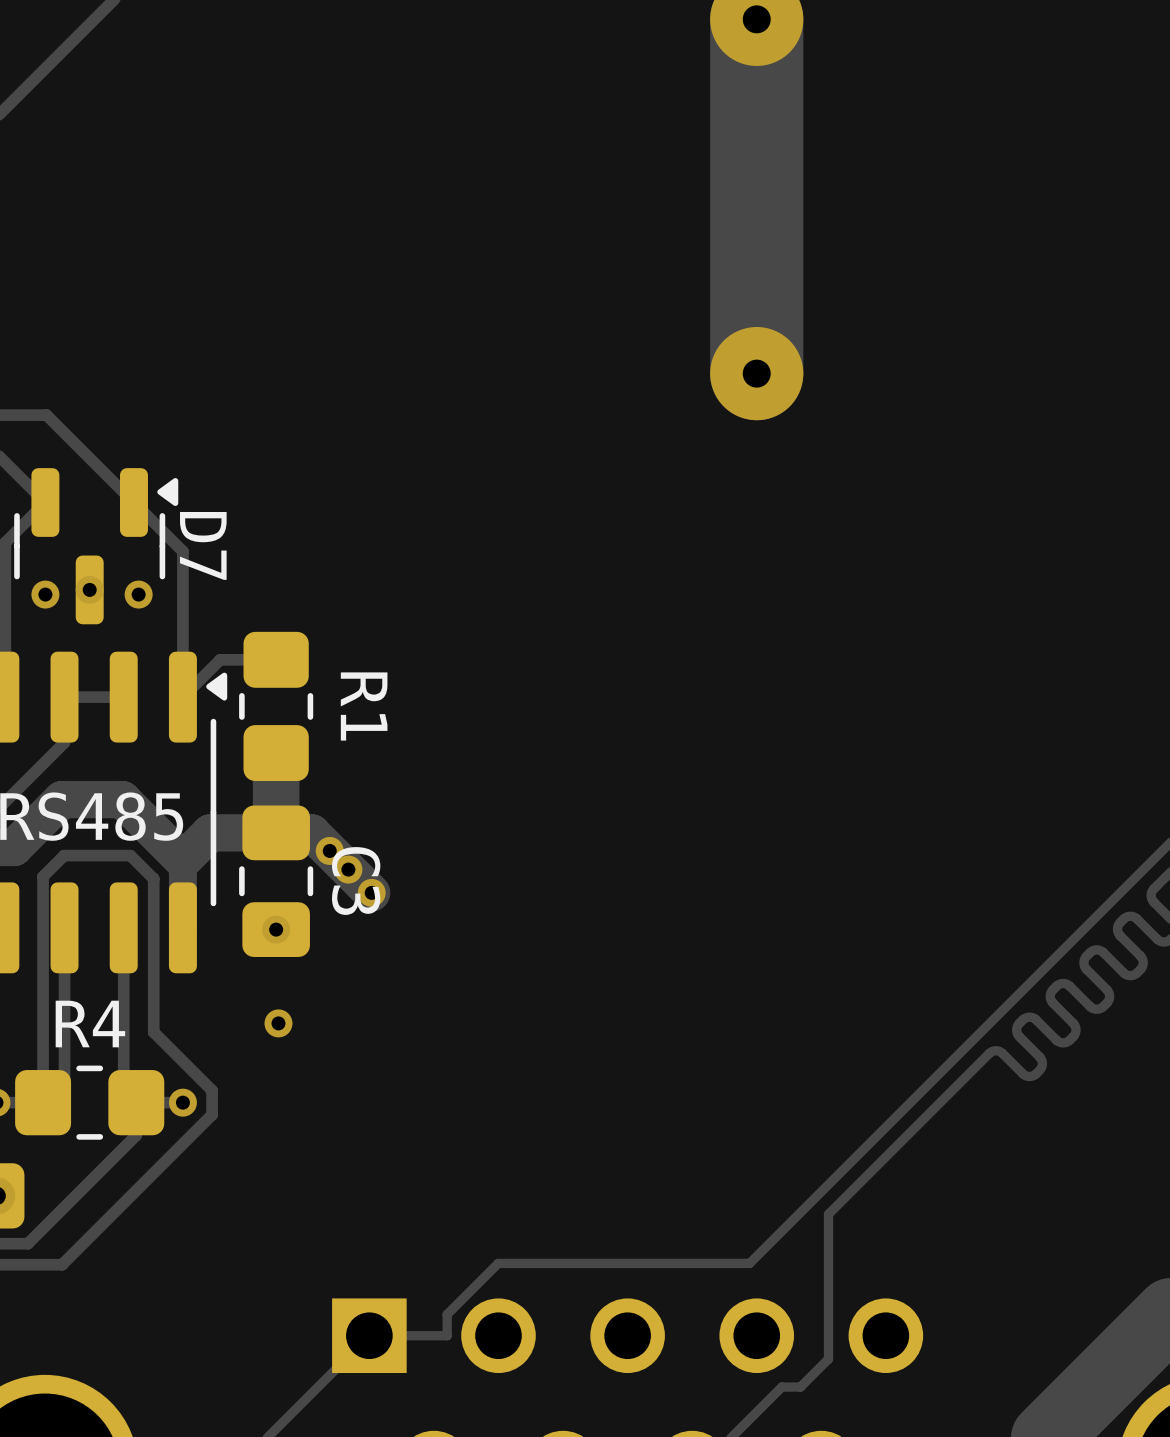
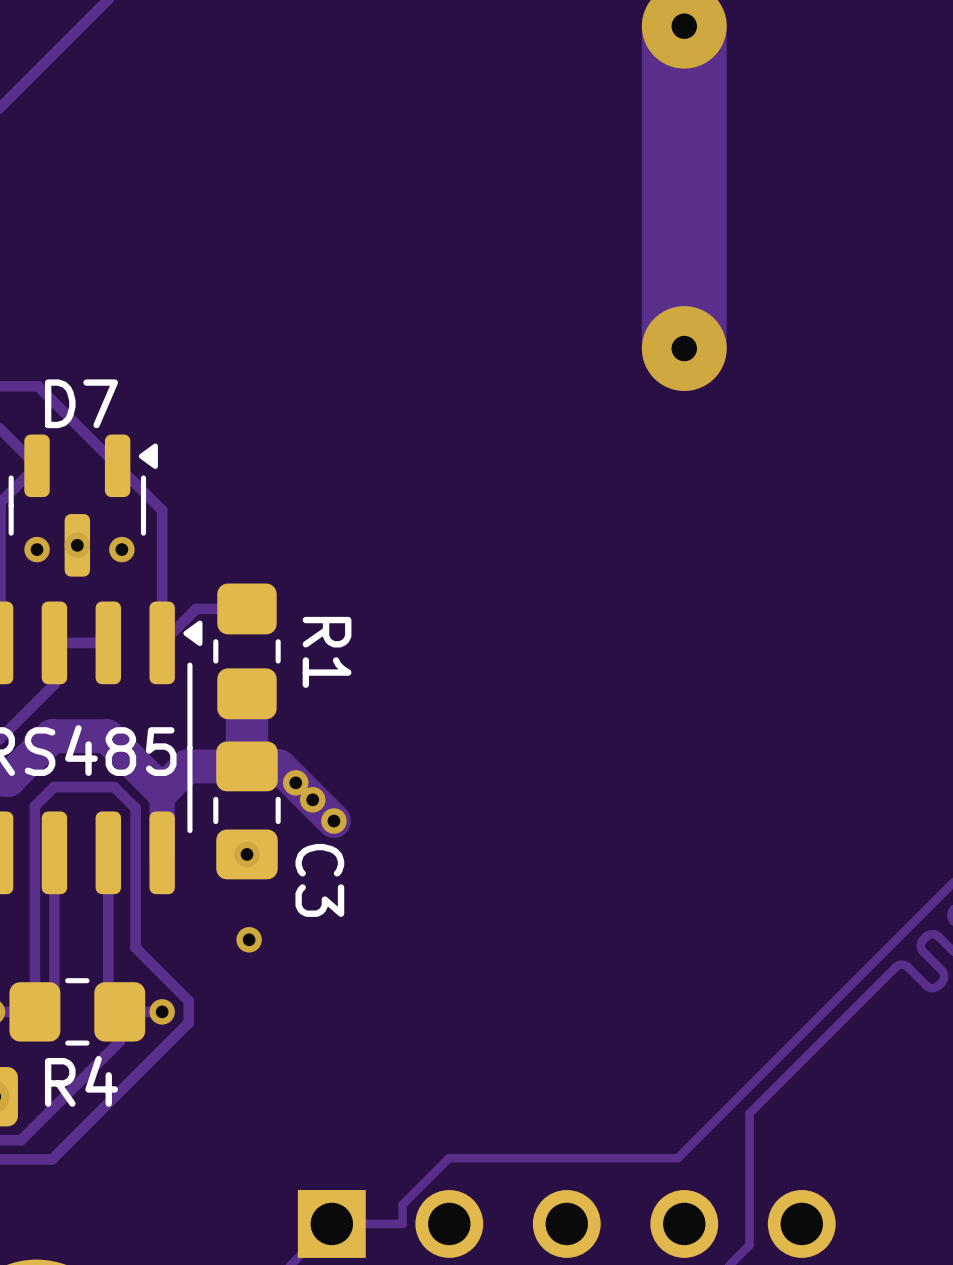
D7 name rotation: 0° (203, 545) -> 90° counterclockwise (81, 403)
D7 name position: D7 (203, 545) -> D7 (81, 403)
C3 name position: C3 (356, 881) -> C3 (319, 880)
R4 name position: R4 (90, 1024) -> R4 (81, 1081)

